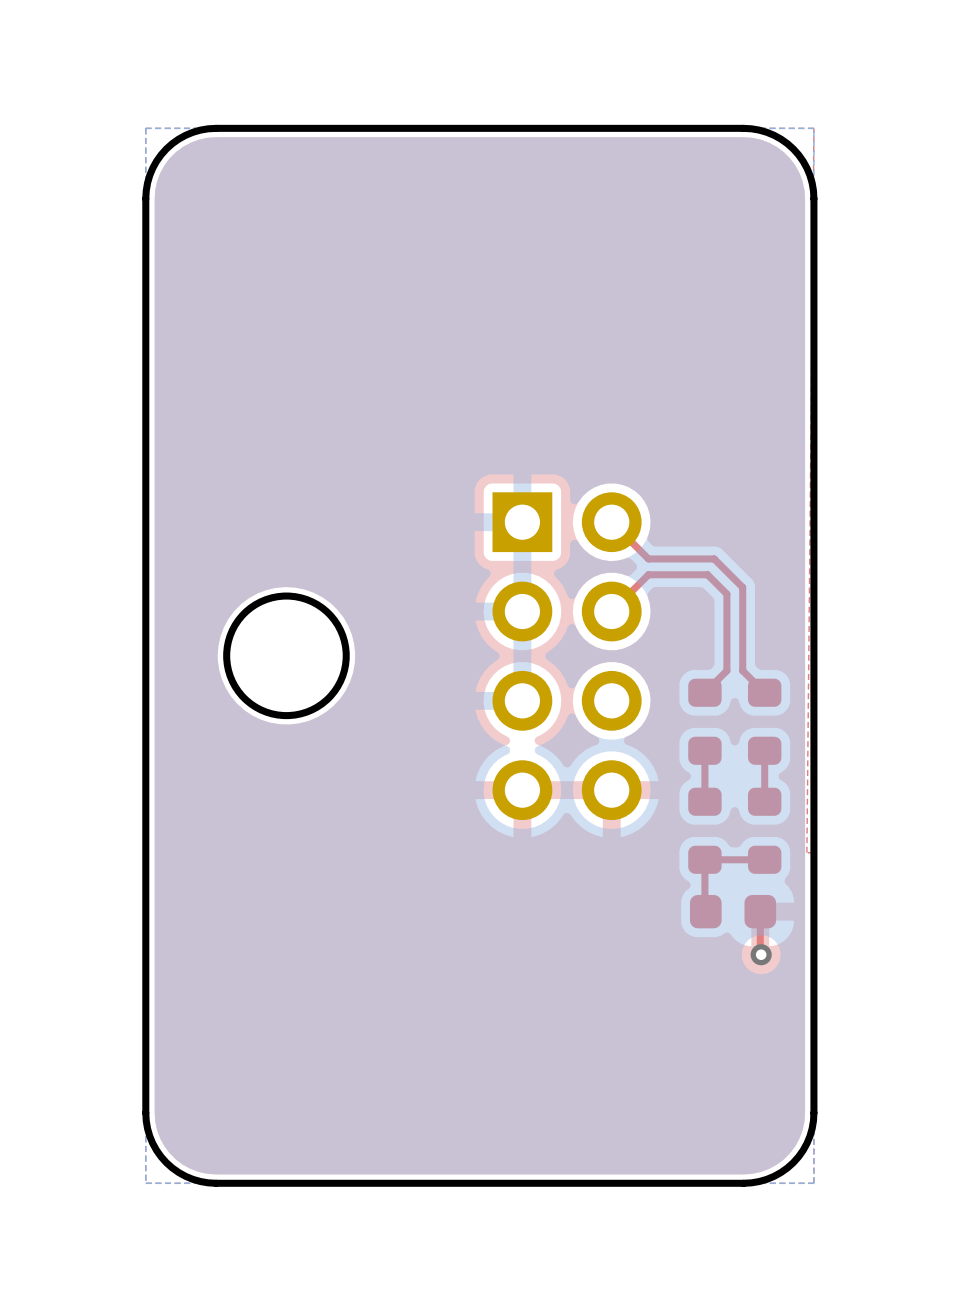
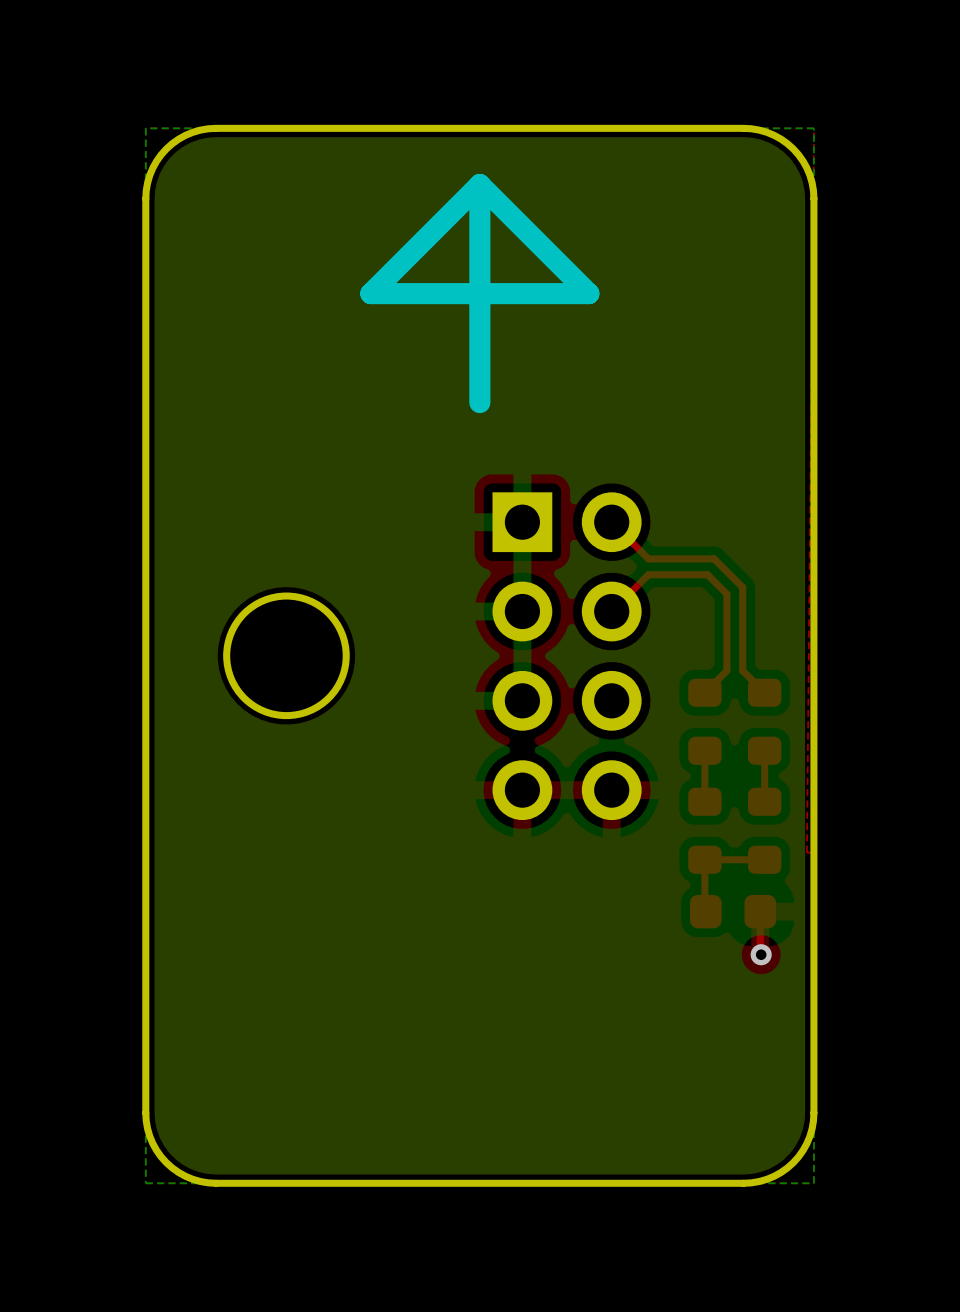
line: none -> (479, 184) (370, 293) (588, 293) (479, 184)
line: none -> (479, 184) (479, 402)

